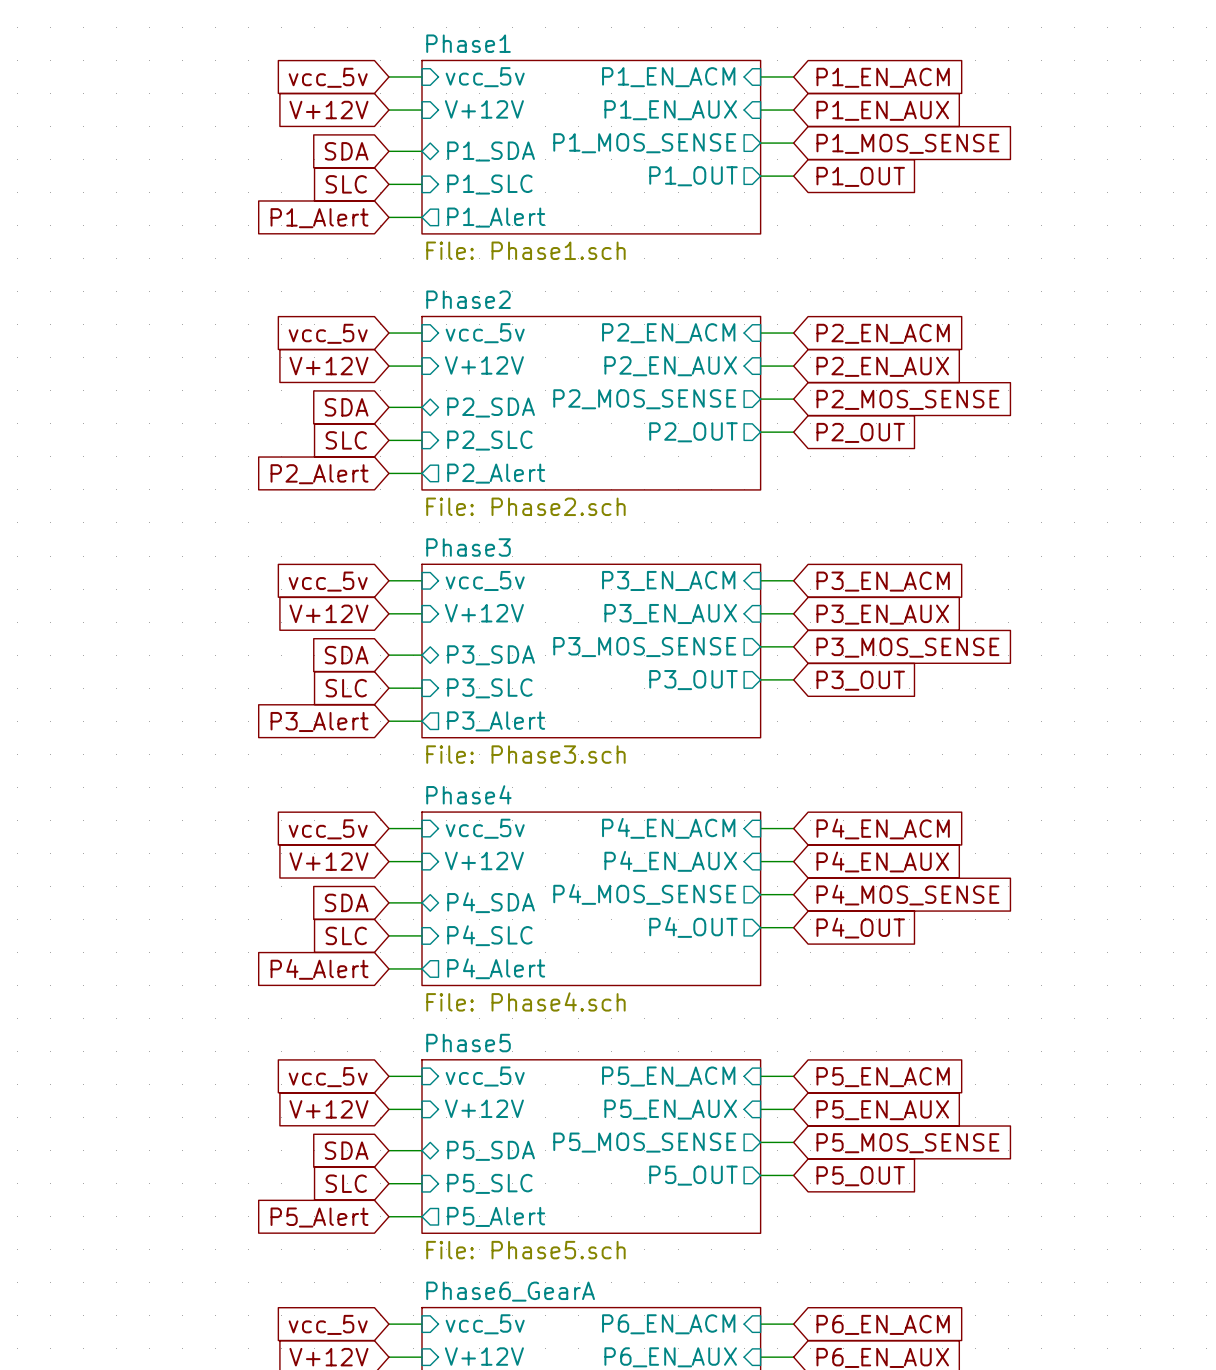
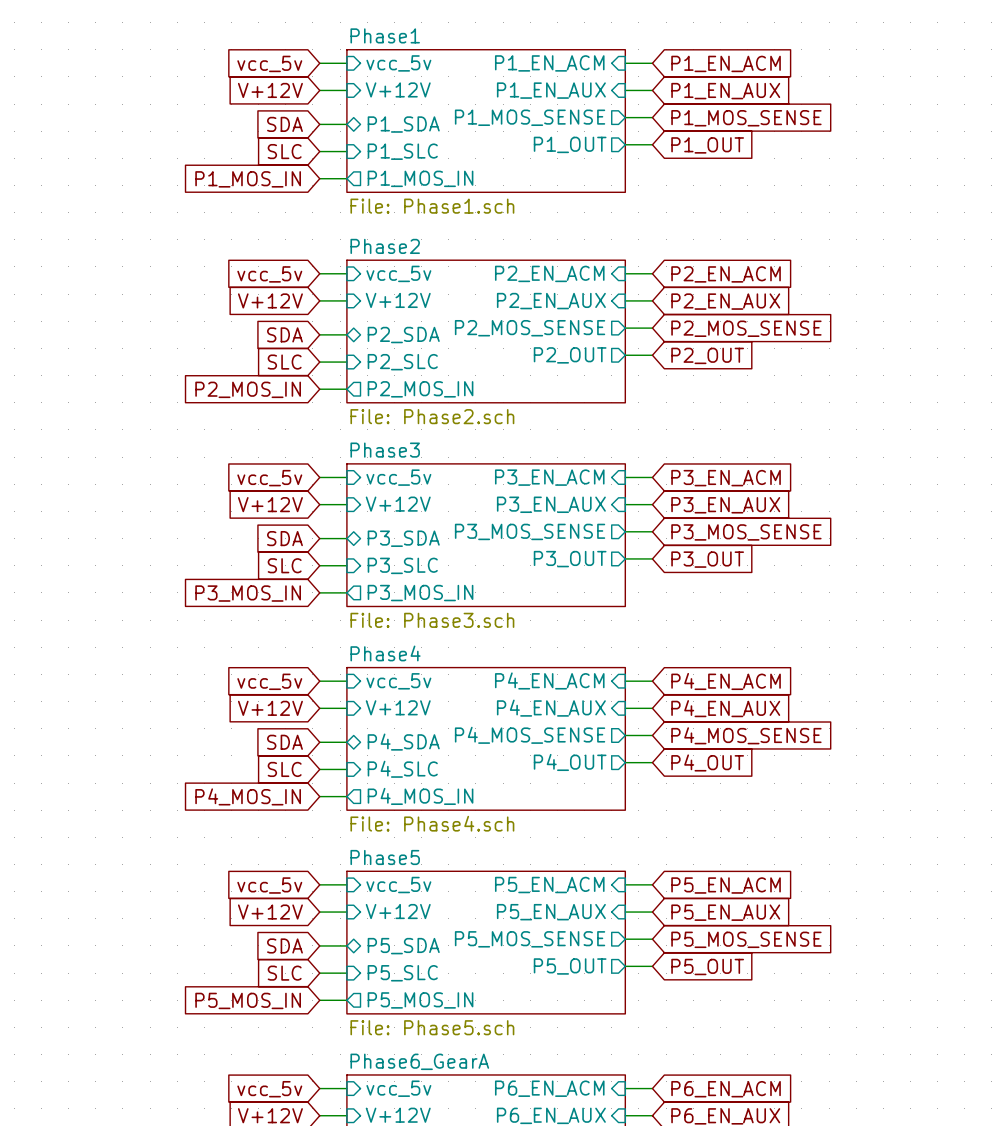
sheet pin: P1_Alert (496, 217) -> P1_MOS_IN (420, 178)
global label: P1_Alert (319, 218) -> P1_MOS_IN (248, 179)
sheet pin: P2_Alert (496, 473) -> P2_MOS_IN (420, 389)
global label: P2_Alert (319, 474) -> P2_MOS_IN (248, 389)
global label: P3_Alert (319, 721) -> P3_MOS_IN (248, 593)
sheet pin: P3_Alert (496, 721) -> P3_MOS_IN (420, 593)
sheet pin: P4_Alert (496, 968) -> P4_MOS_IN (420, 796)
global label: P4_Alert (319, 969) -> P4_MOS_IN (248, 796)
sheet pin: P5_Alert (496, 1216) -> P5_MOS_IN (420, 1000)
global label: P5_Alert (319, 1217) -> P5_MOS_IN (248, 1000)

